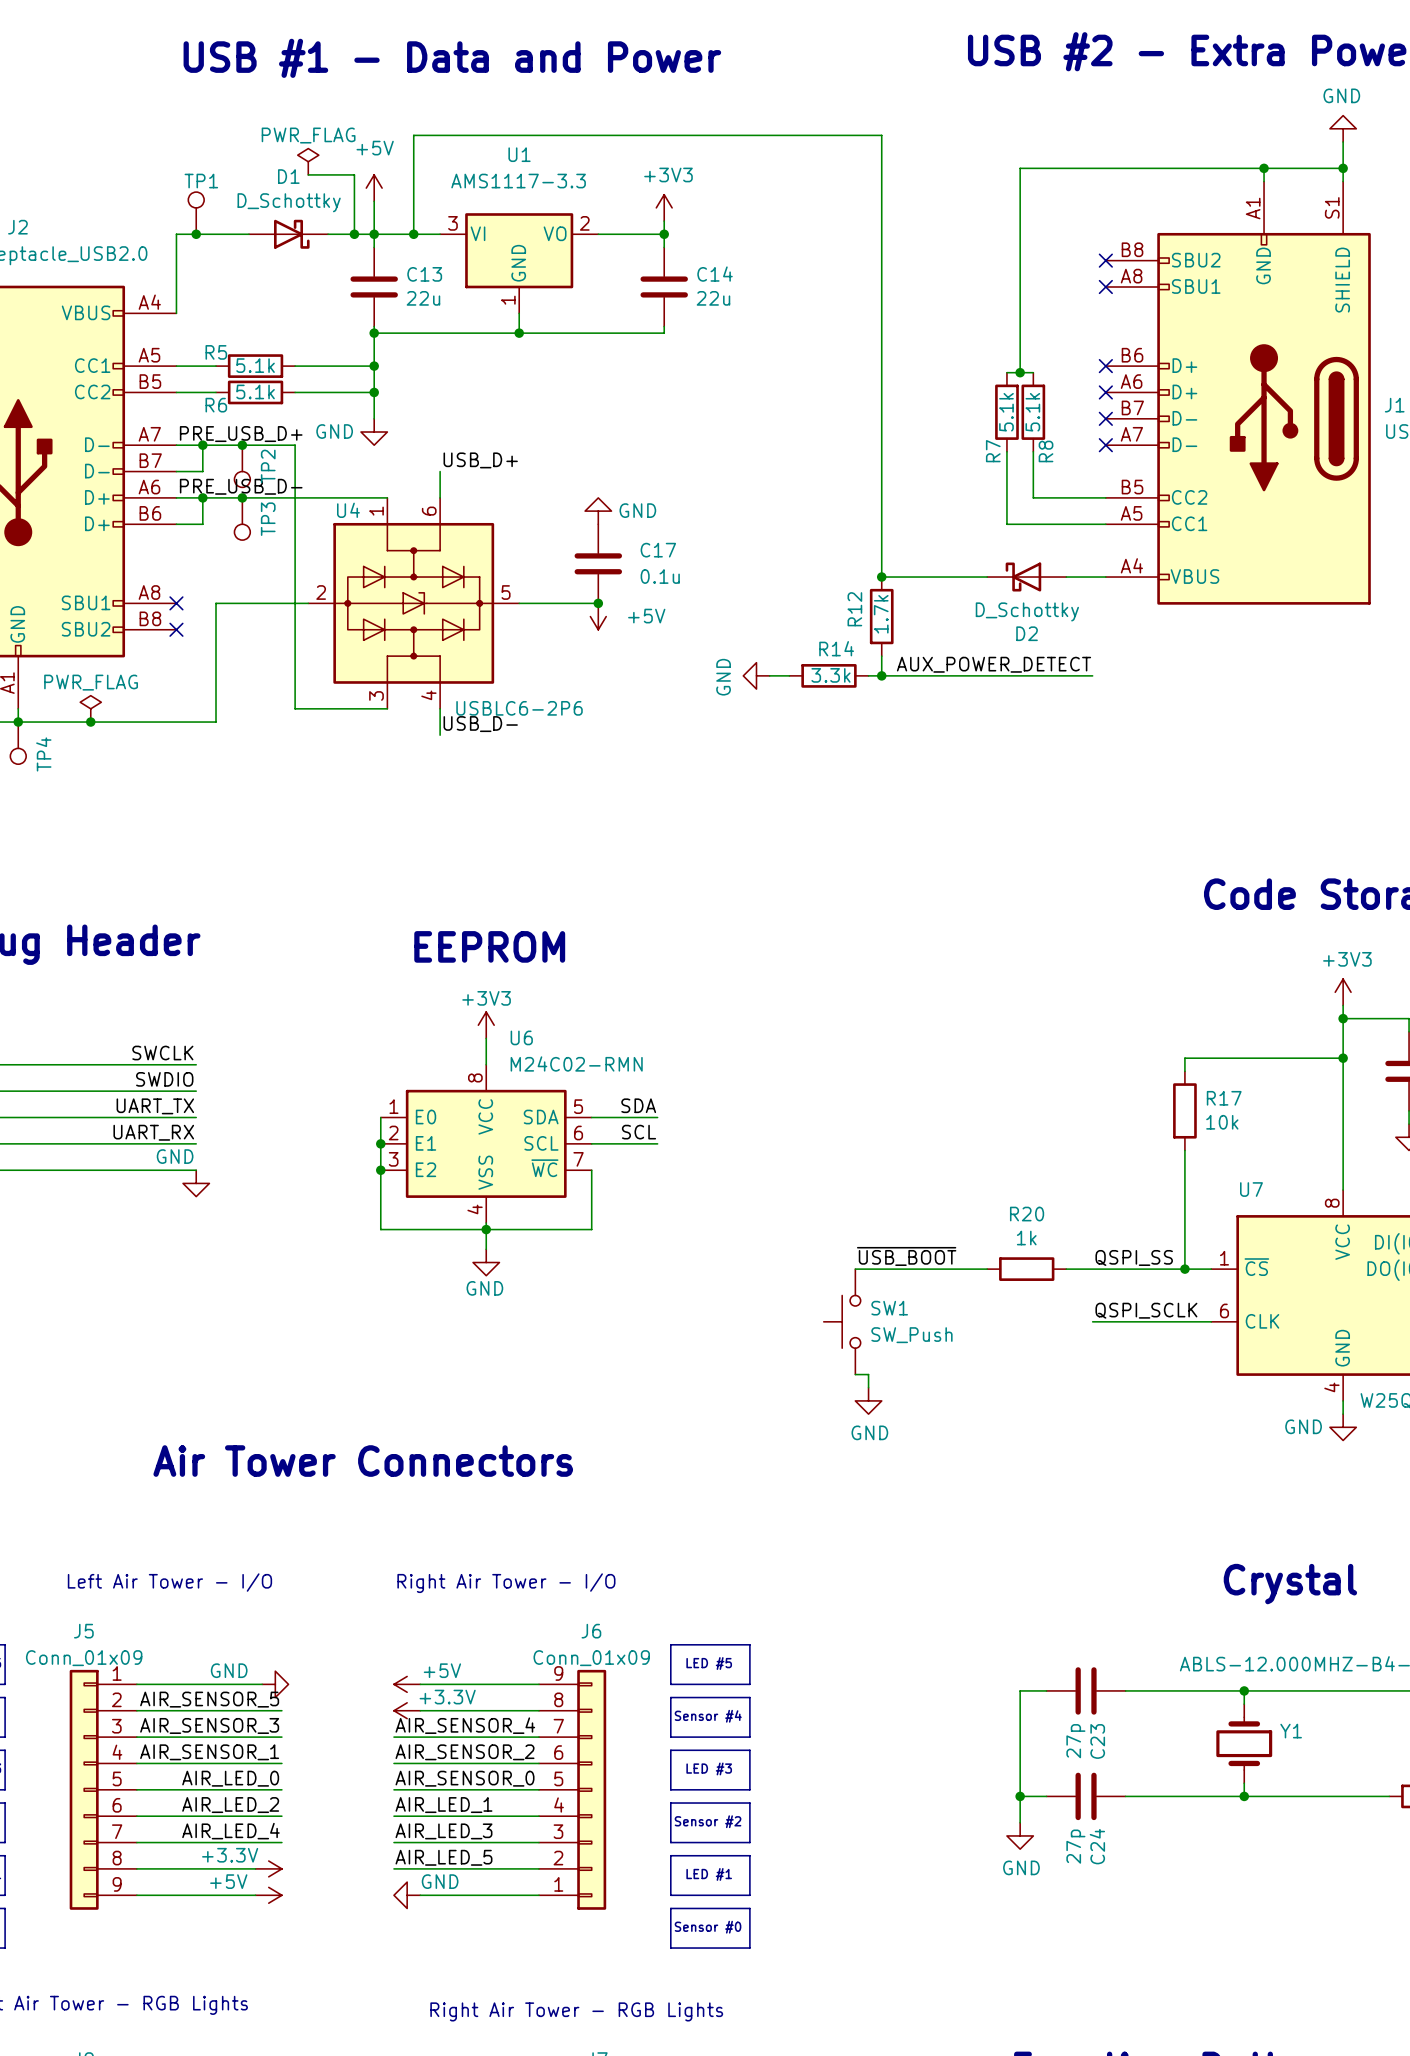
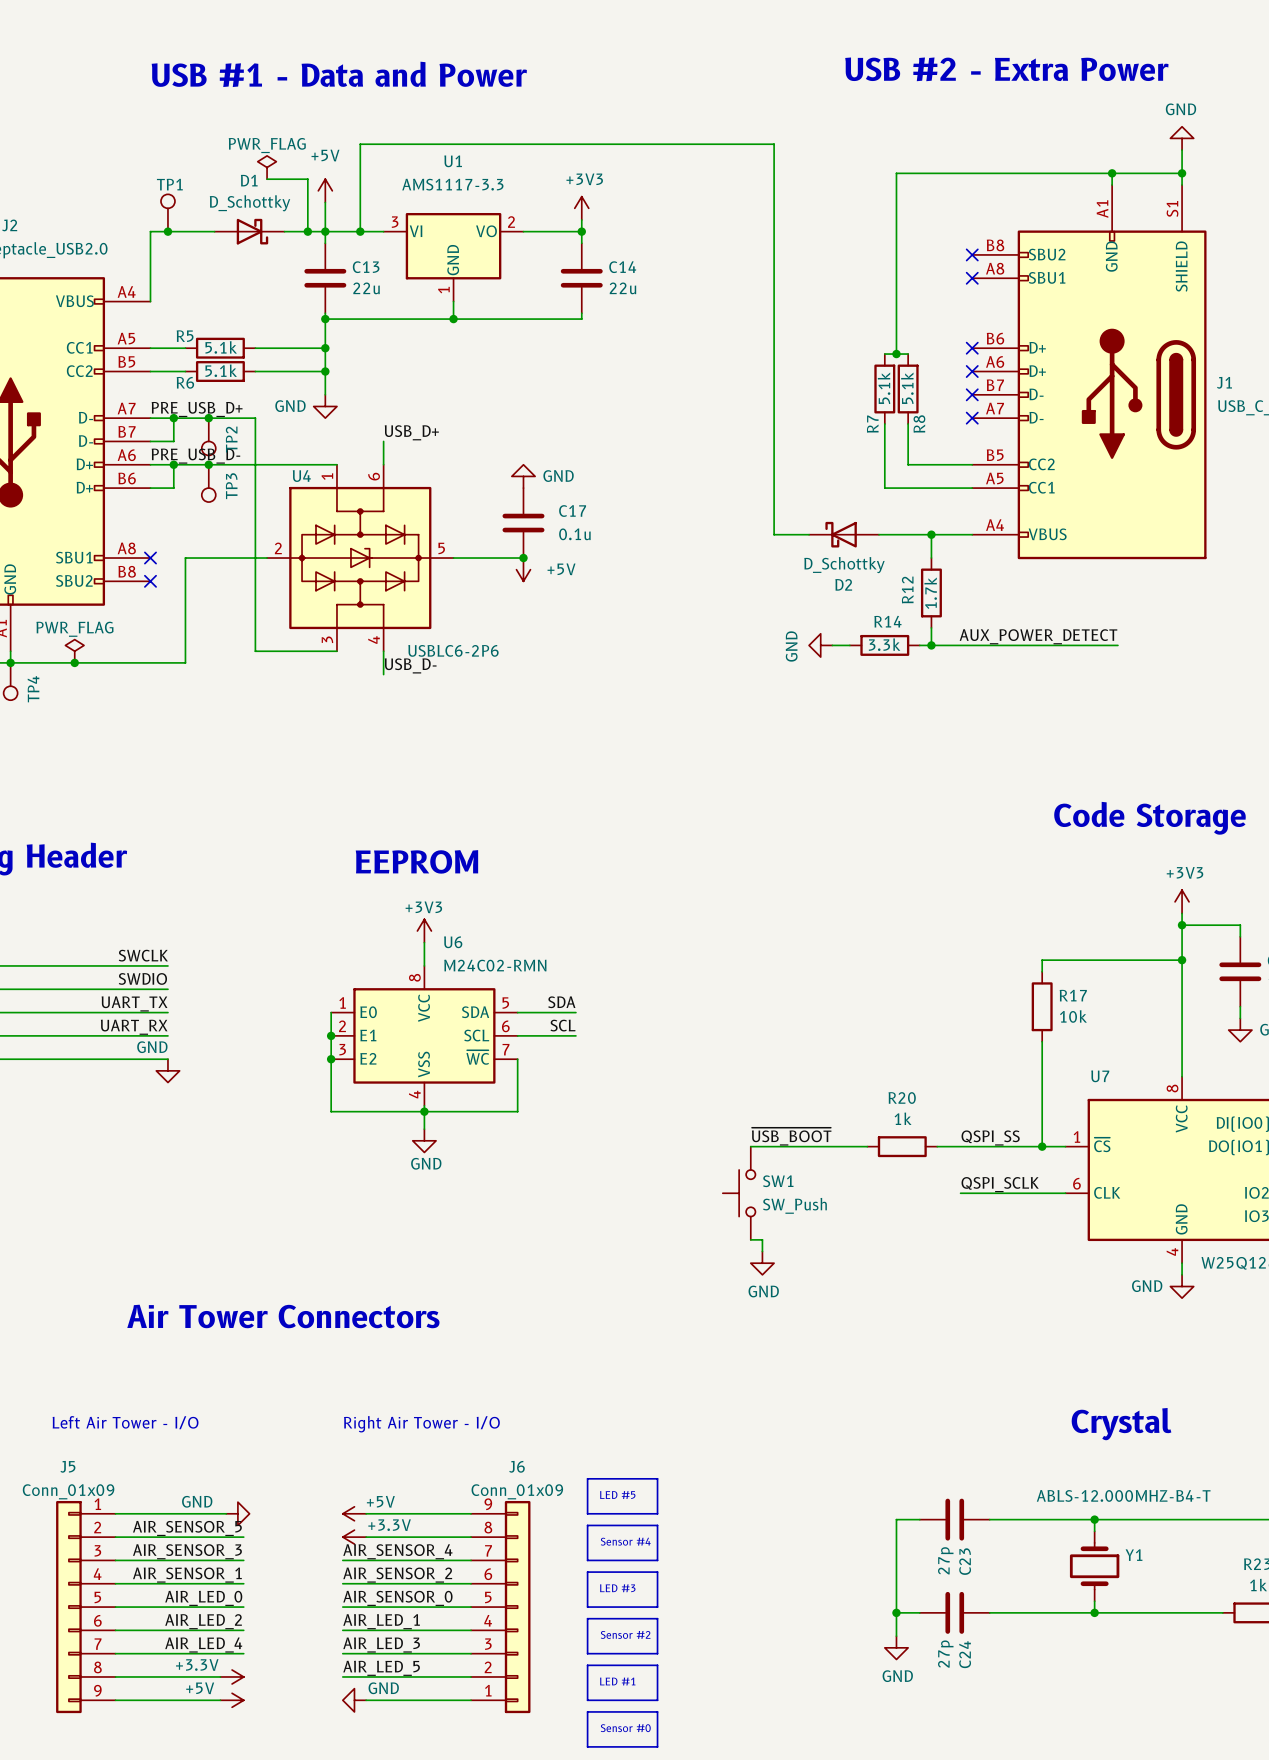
junction: (881, 577) -> none
D2 position: (1026, 577) -> (844, 534)
wire: none -> (931, 534) (931, 558)
junction: none -> (931, 534)
R12 position: (881, 616) -> (931, 592)
wire: (881, 656) (881, 675) -> (931, 627) (931, 645)
label position: AUX_POWER_DETECT (994, 664) -> AUX_POWER_DETECT (1038, 636)
power symbol position: GND (756, 675) -> GND (820, 645)
wire: (769, 675) (789, 675) -> (832, 645) (849, 645)
R14 position: (829, 675) -> (884, 645)
wire: (868, 675) (1092, 675) -> (919, 645) (1117, 645)
junction: (881, 675) -> none
junction: none -> (931, 645)

